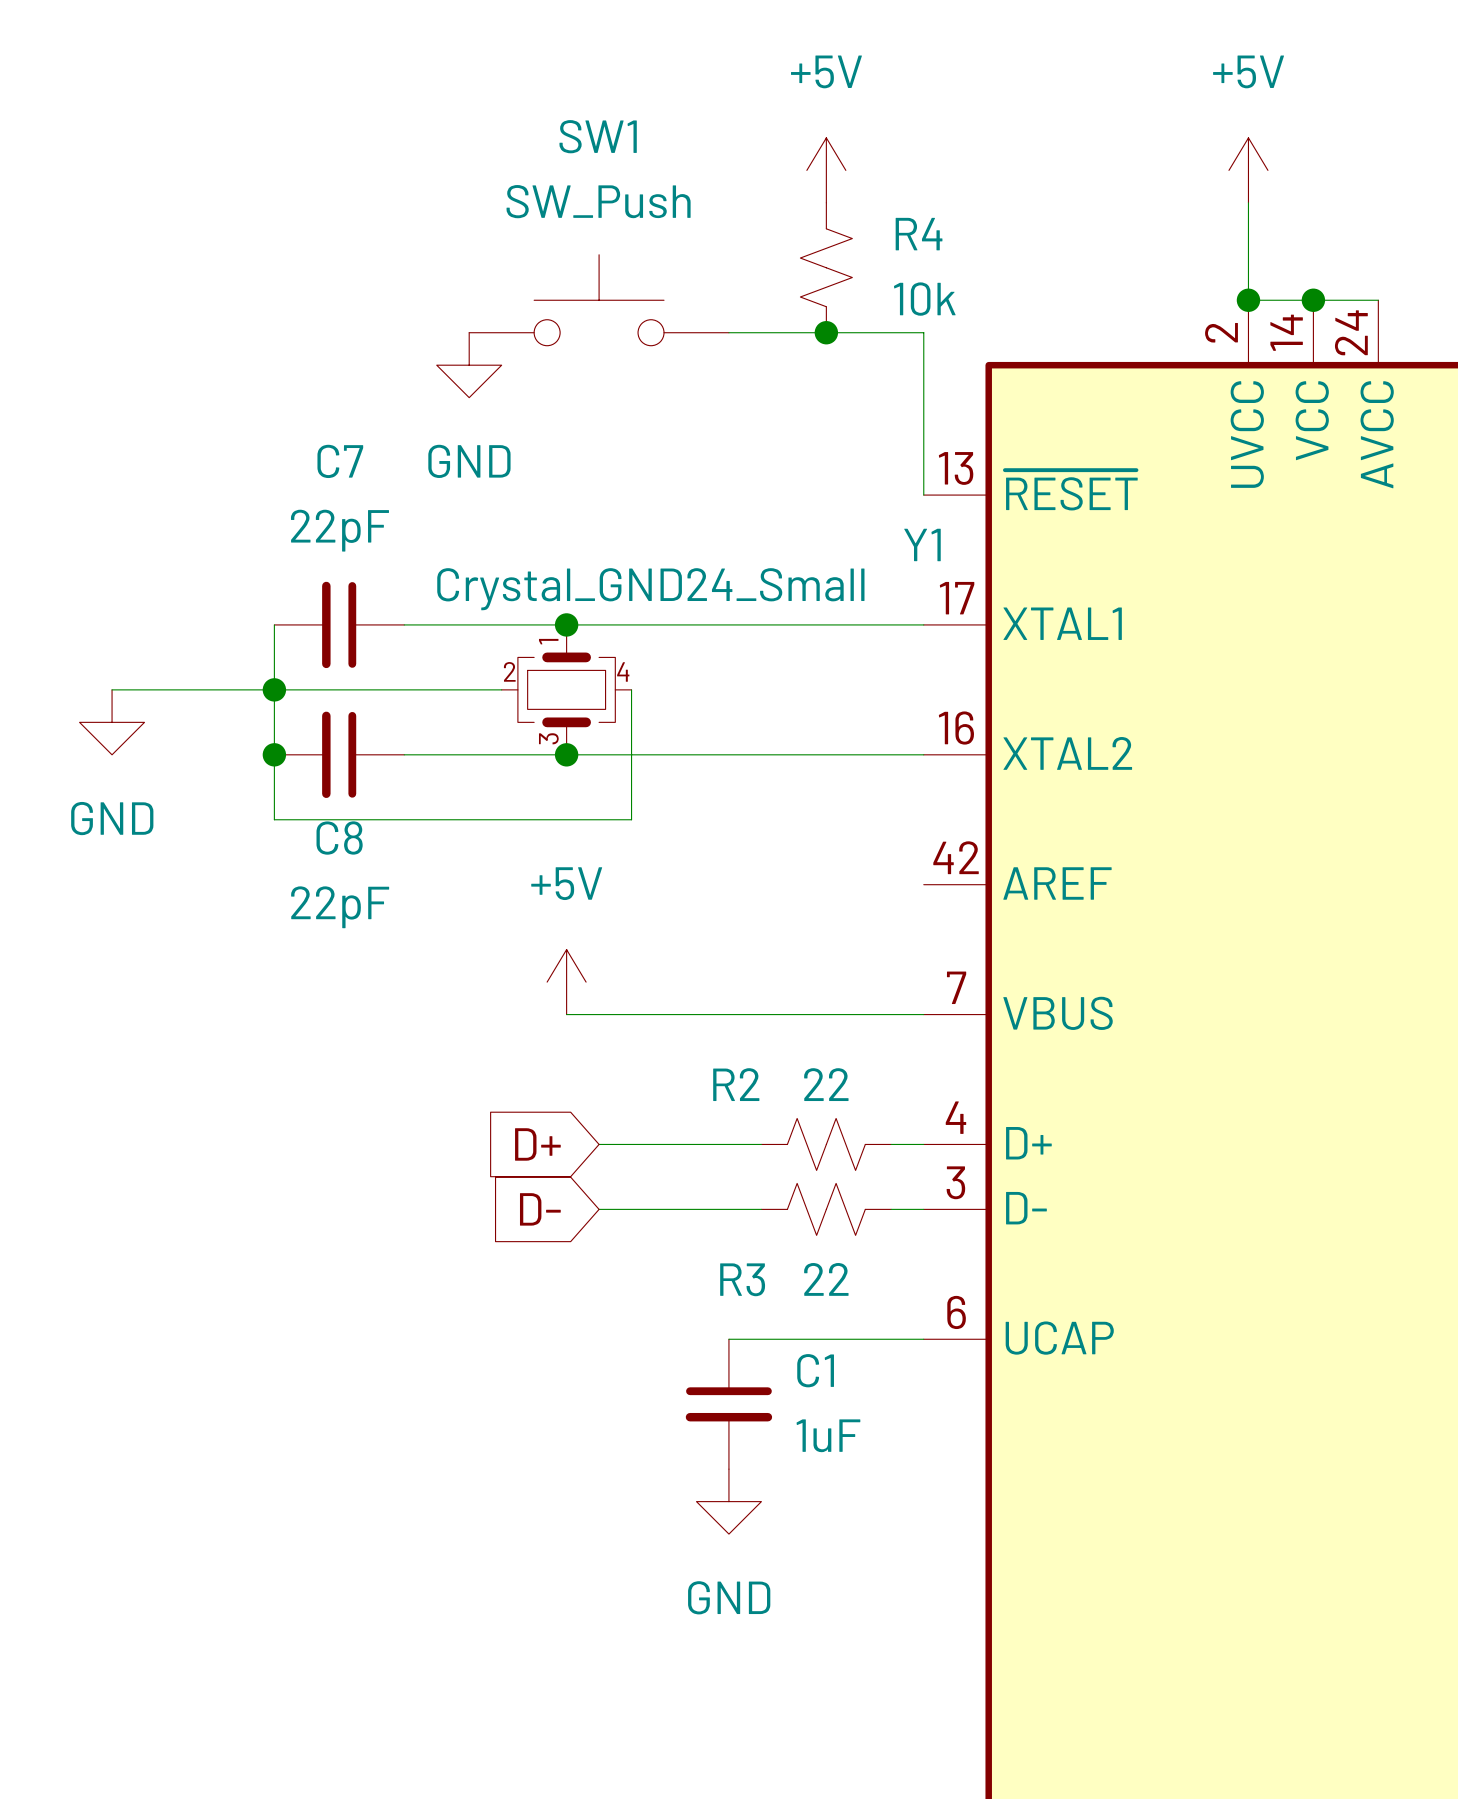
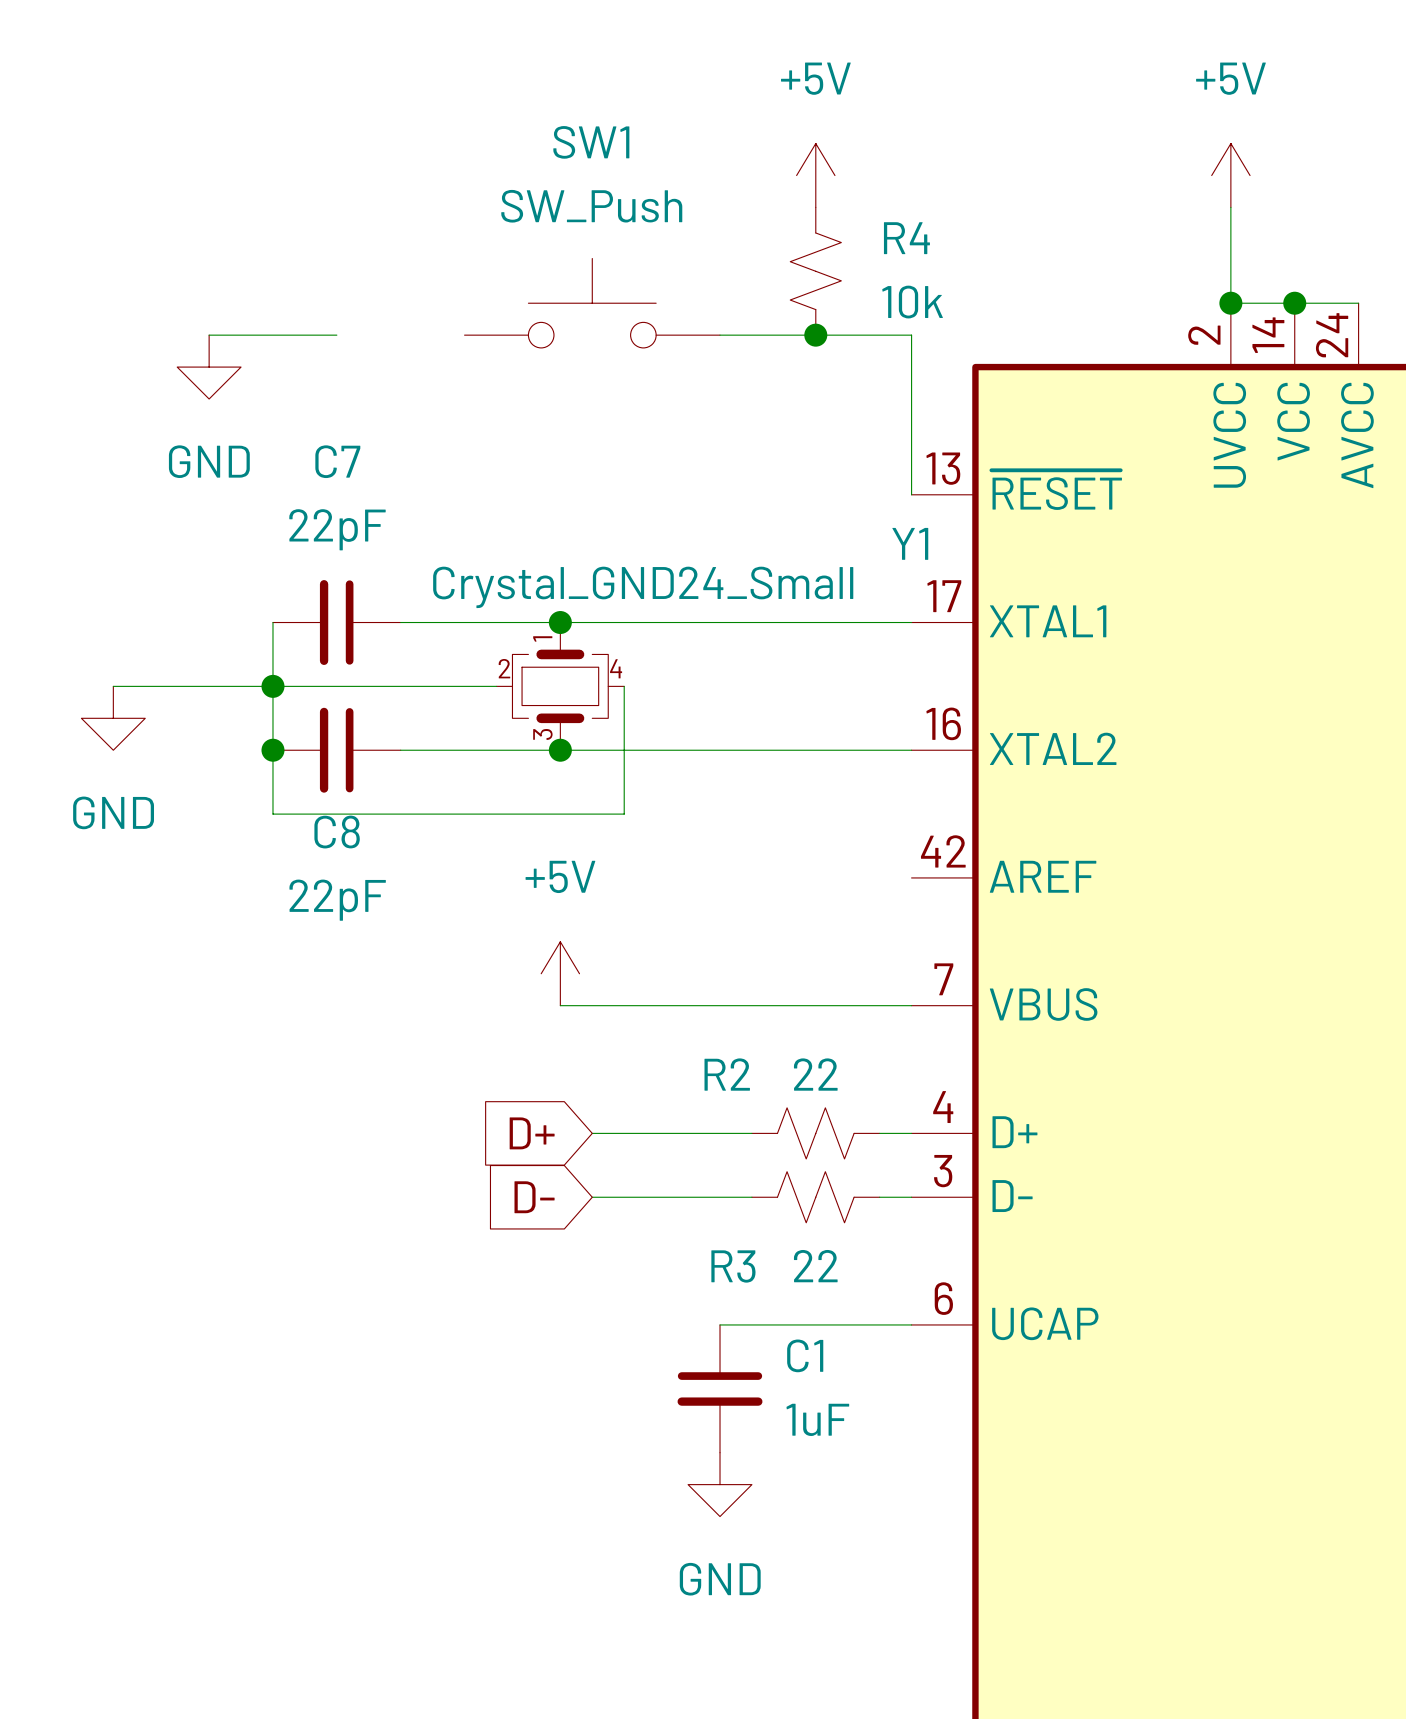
wire: none -> (209, 335) (336, 335)
power symbol position: GND (469, 365) -> GND (209, 367)

